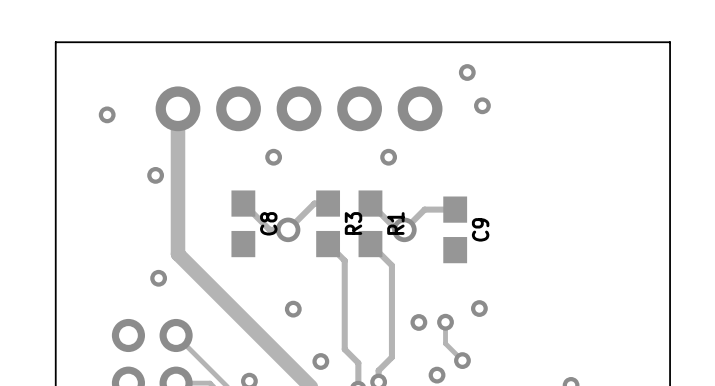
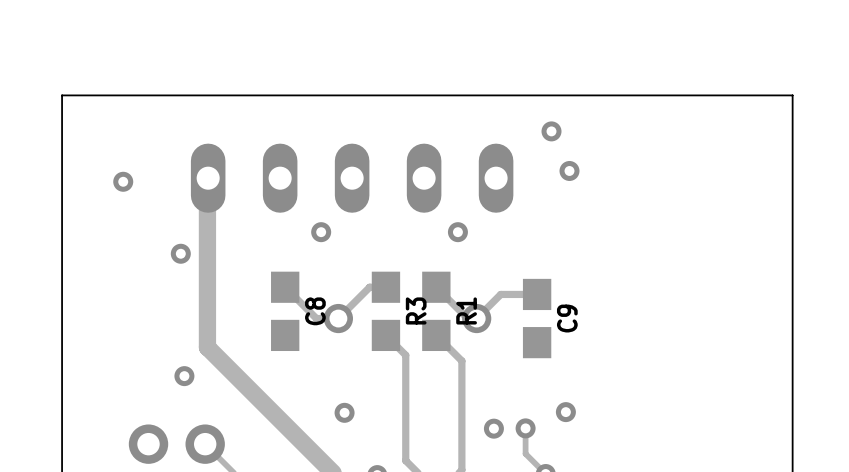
part footprint: [155, 86, 443, 132] -> [190, 143, 514, 213]

